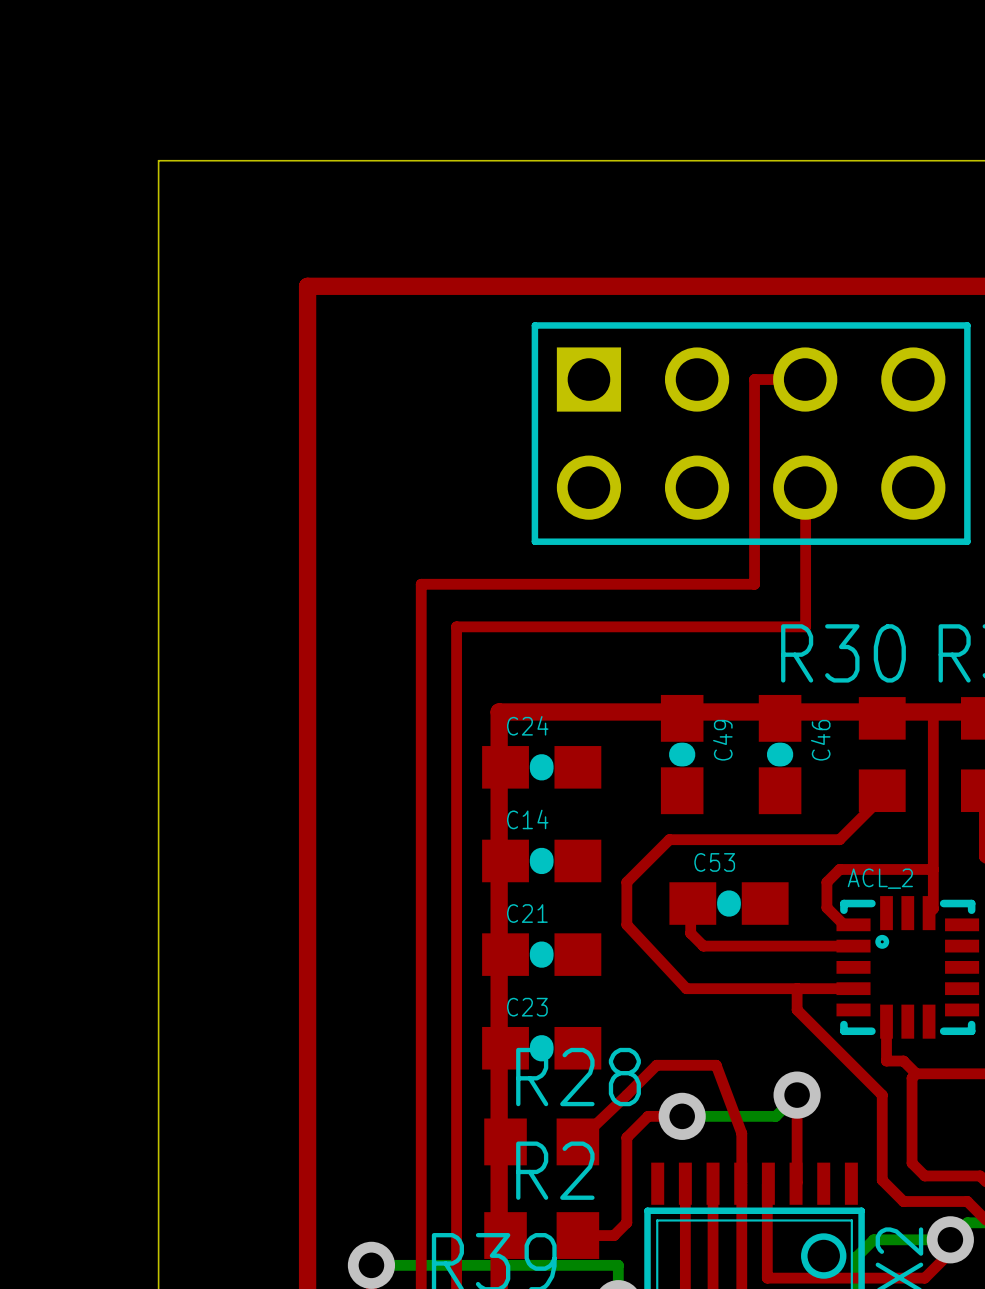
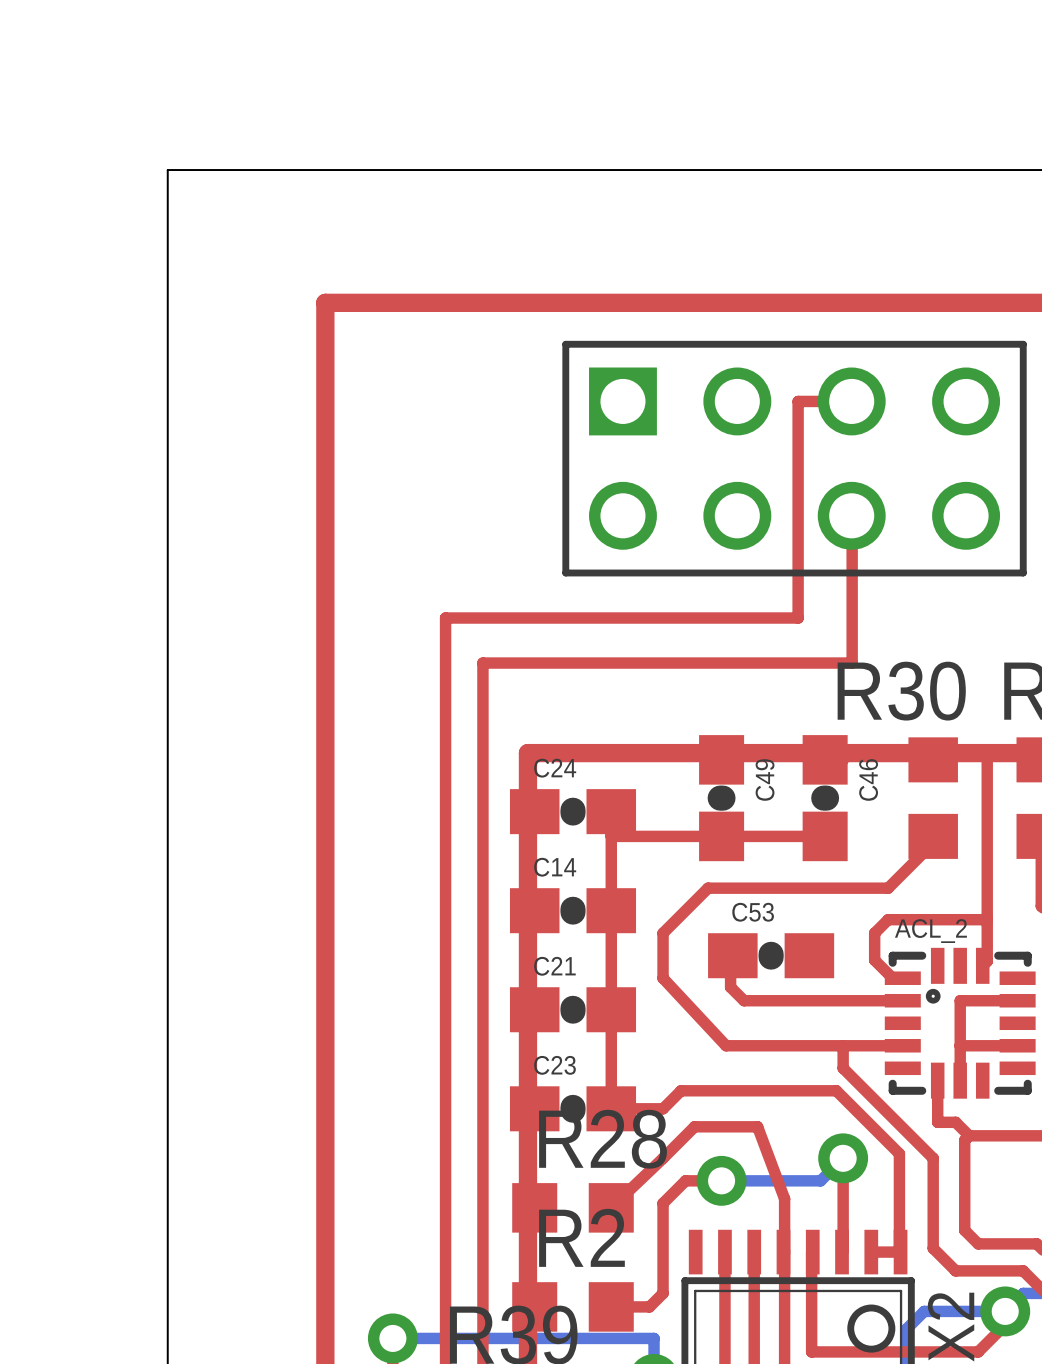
top track: none -> (611, 811) (611, 1108) (663, 1108) (681, 1090) (836, 1090) (899, 1153) (900, 1252) (871, 1252)
top track: none -> (611, 836) (825, 836)
top track: none -> (1017, 1000) (960, 1000) (960, 1080)
top track: none -> (960, 1045) (1017, 1045)

